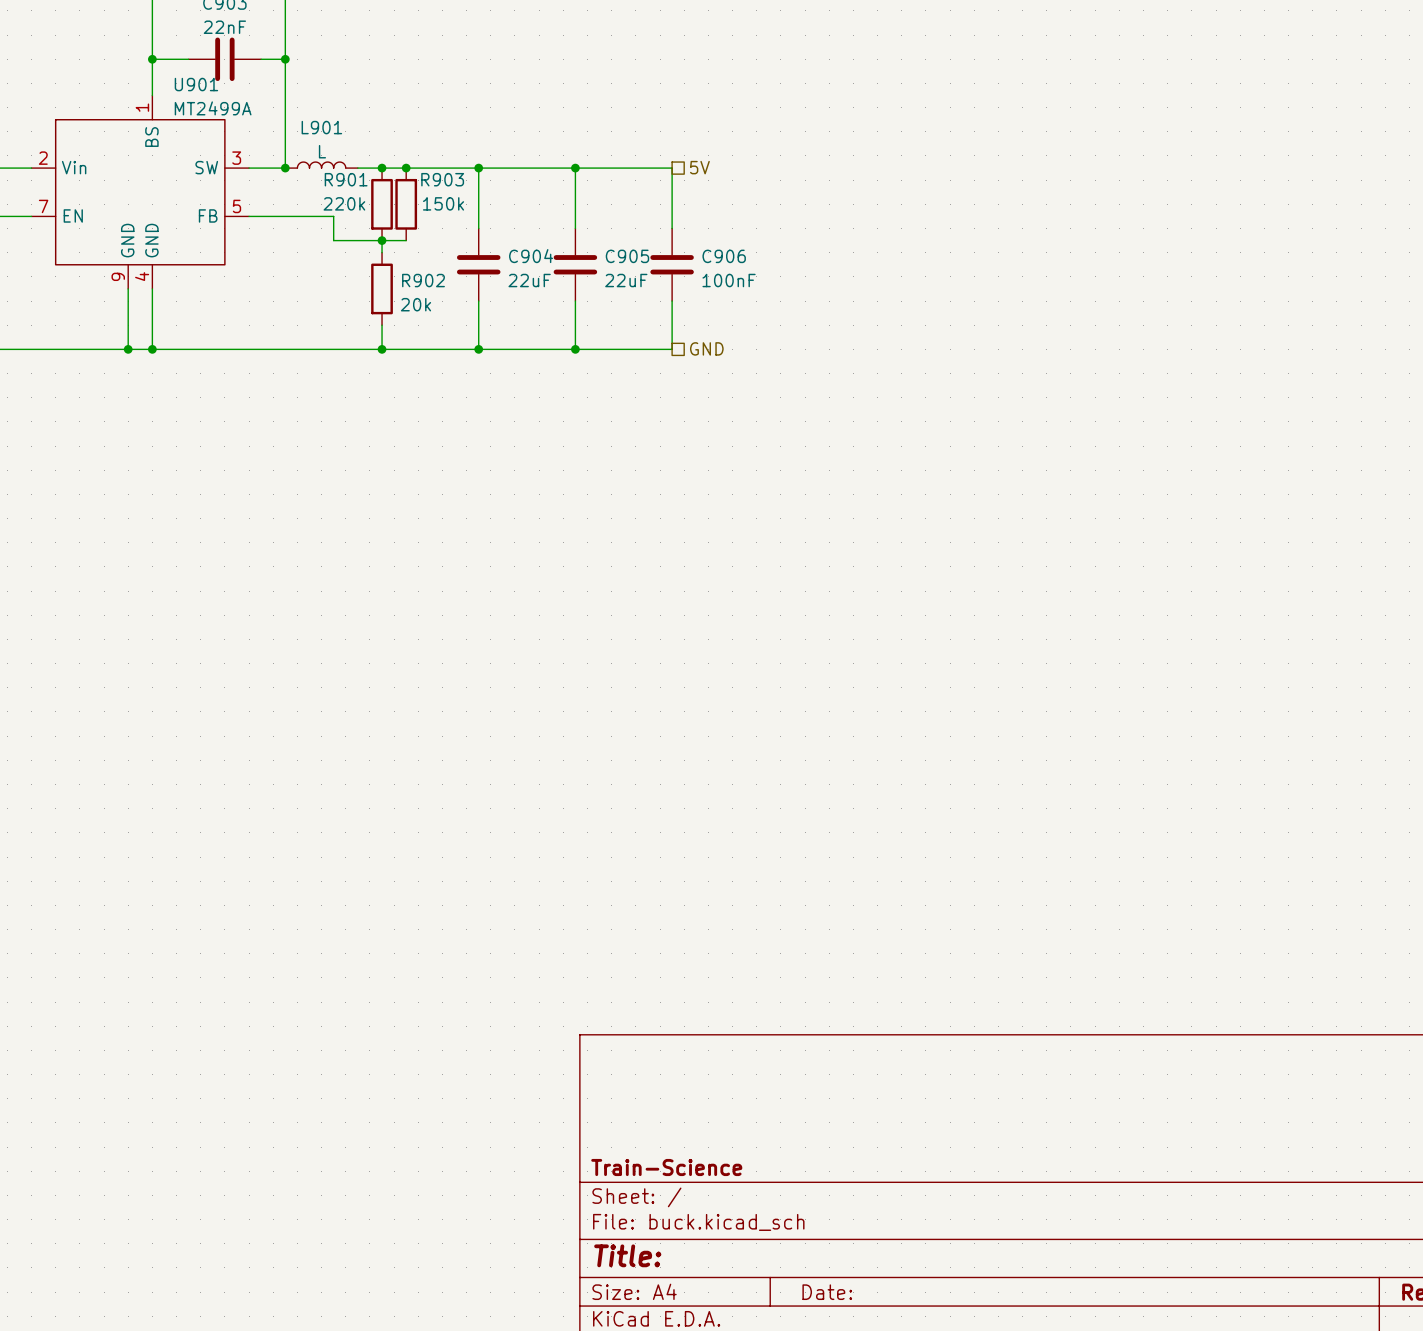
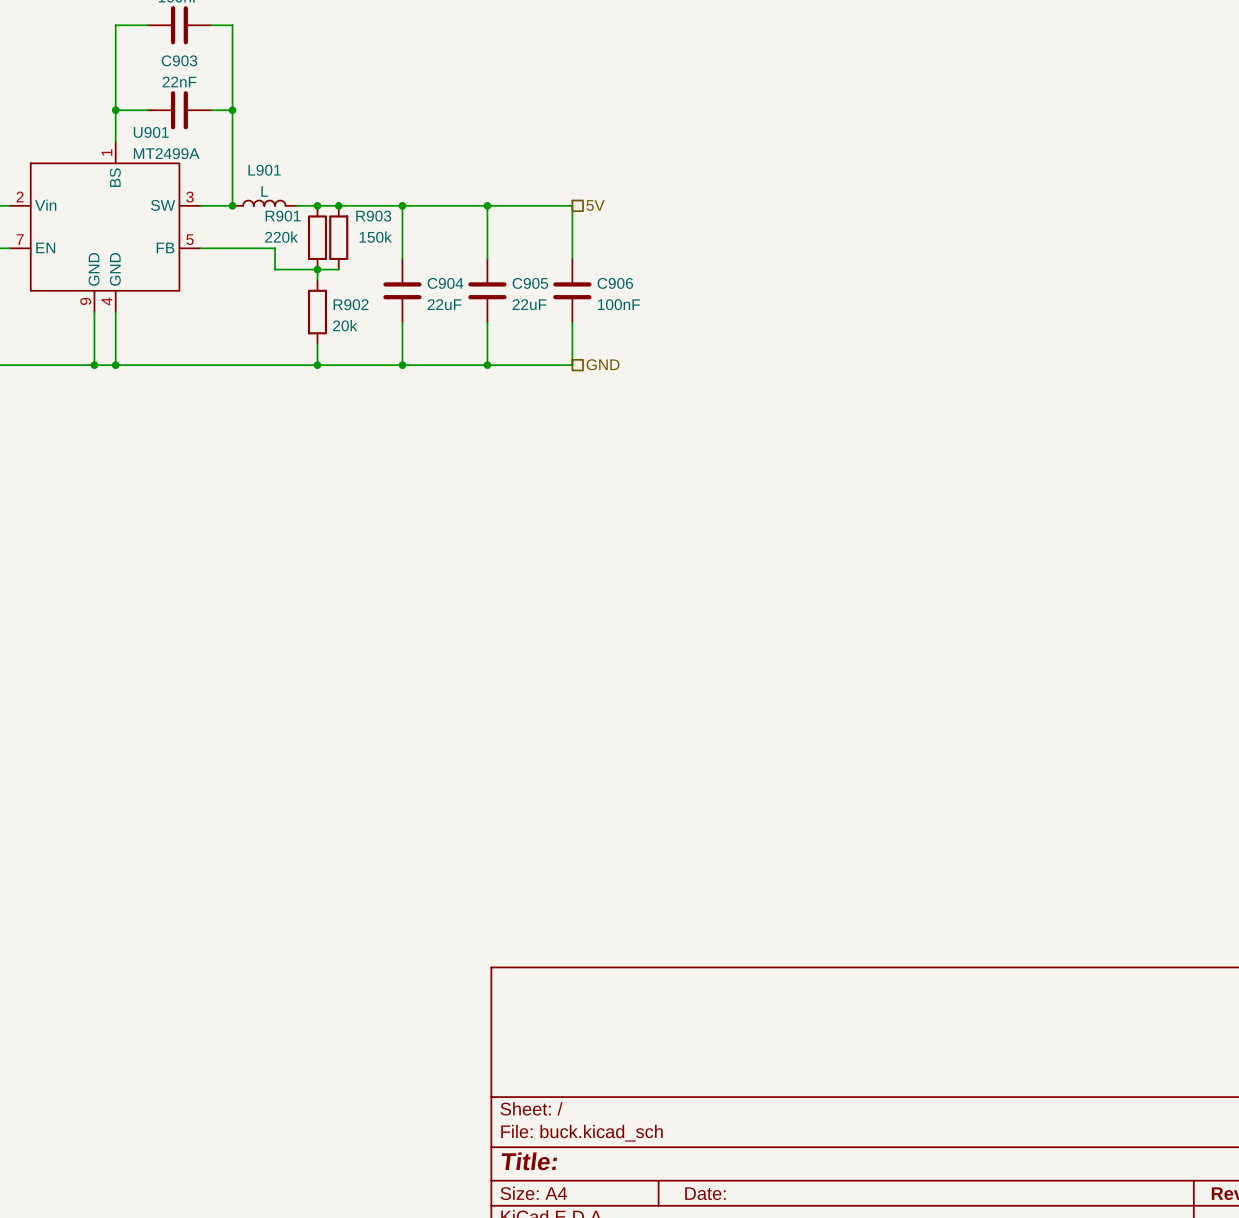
title block: Train-Science (666, 1167) -> none

